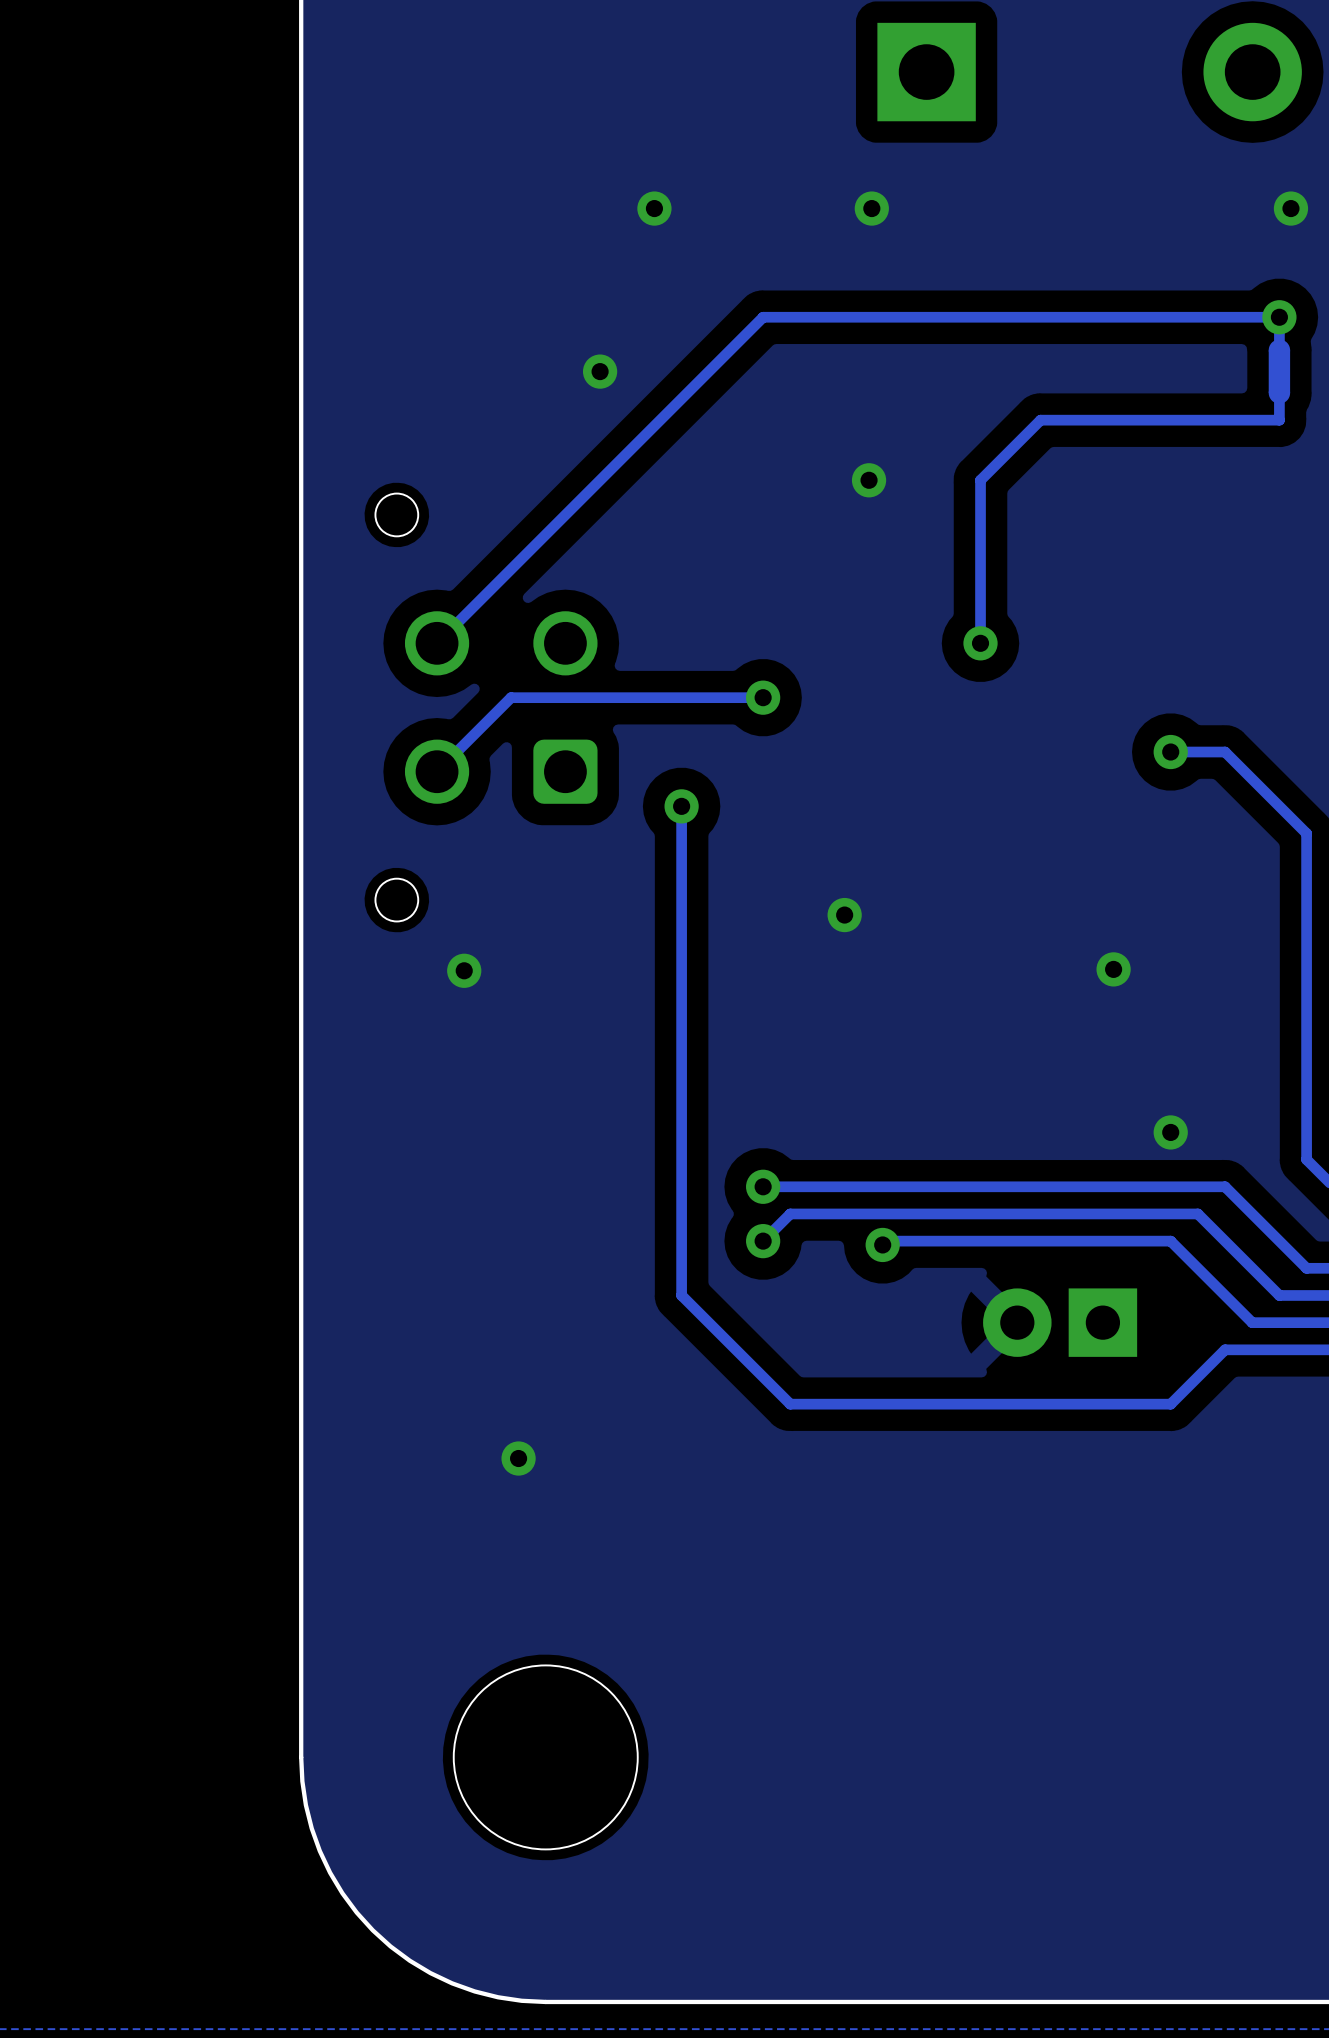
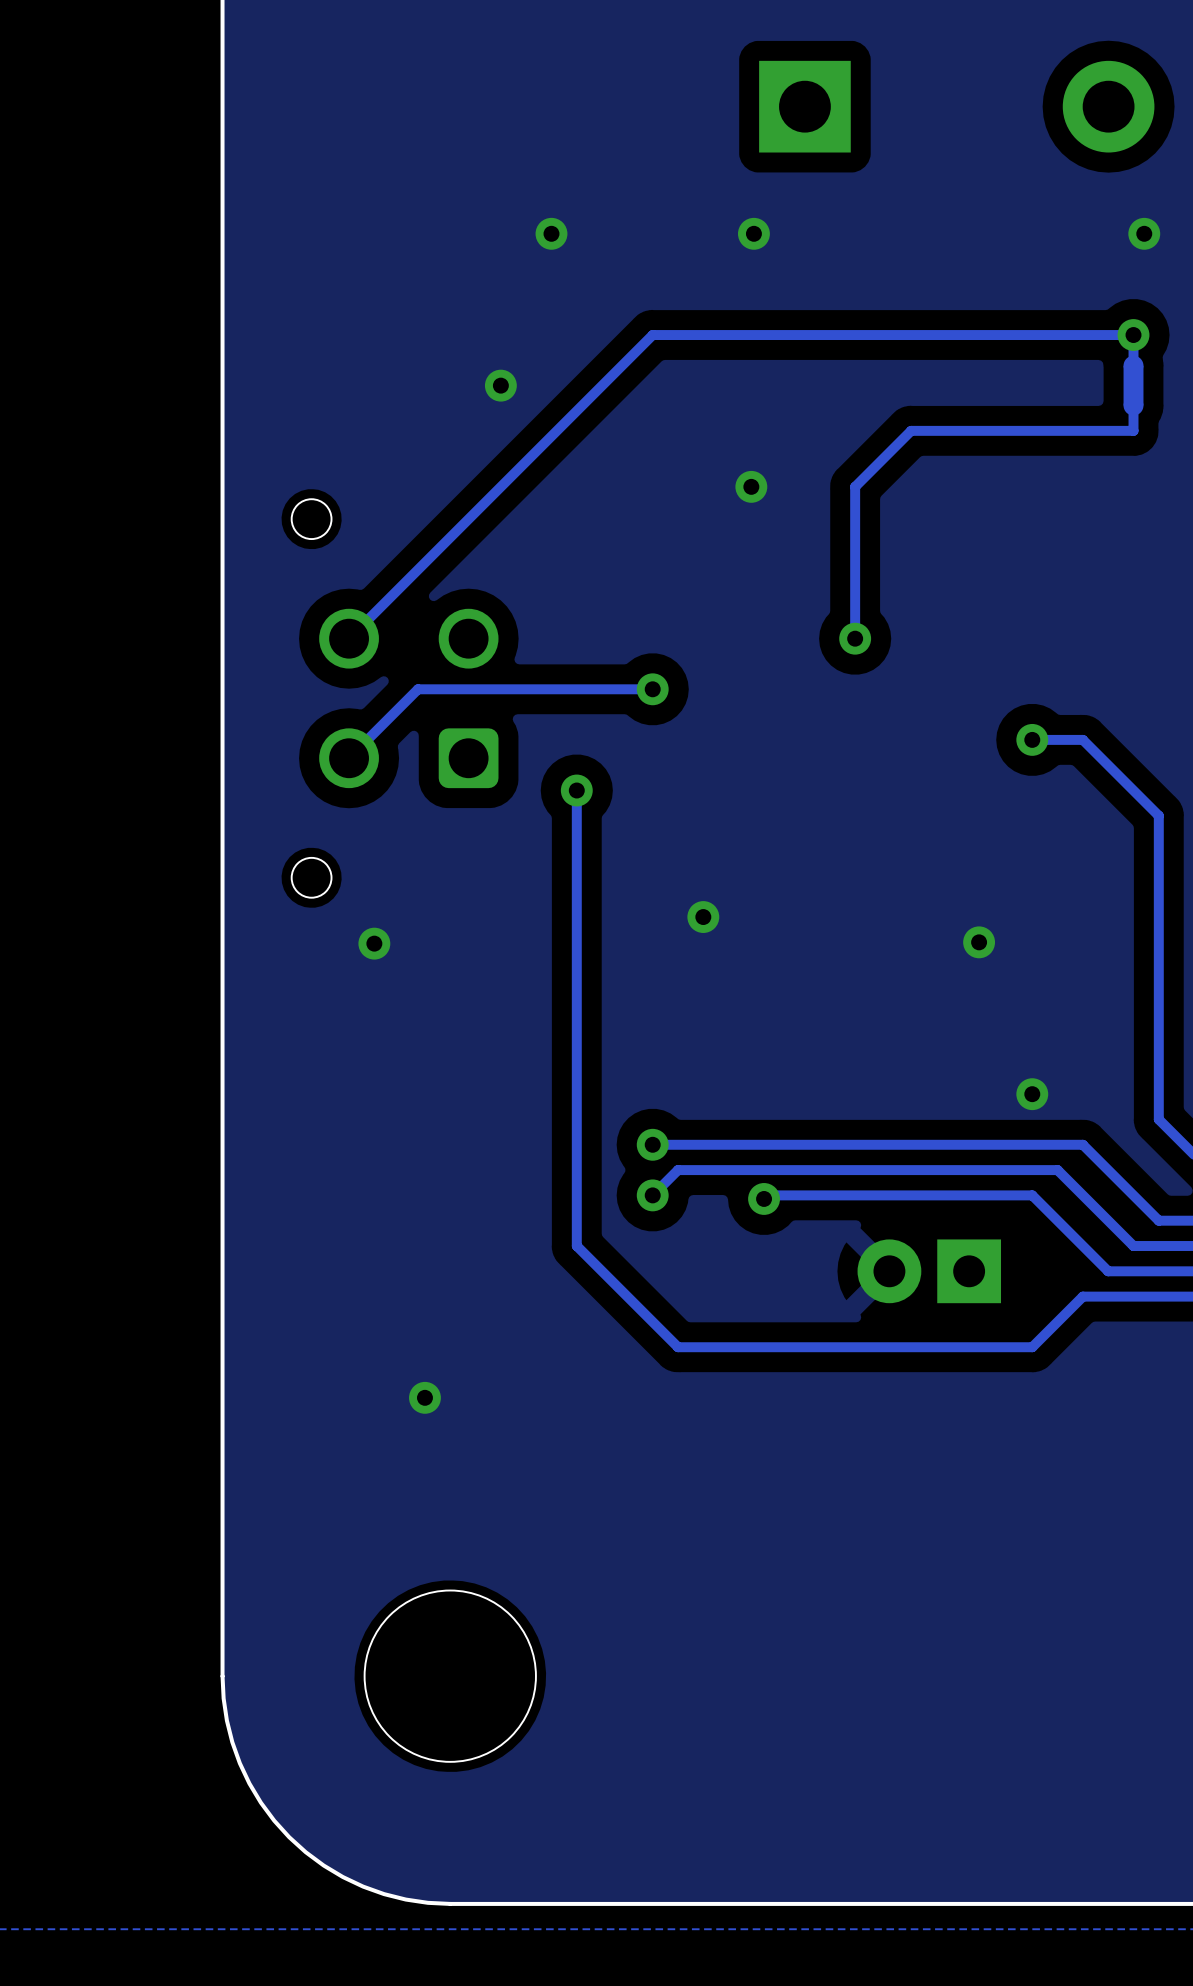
via position: (844, 915) -> (703, 917)

